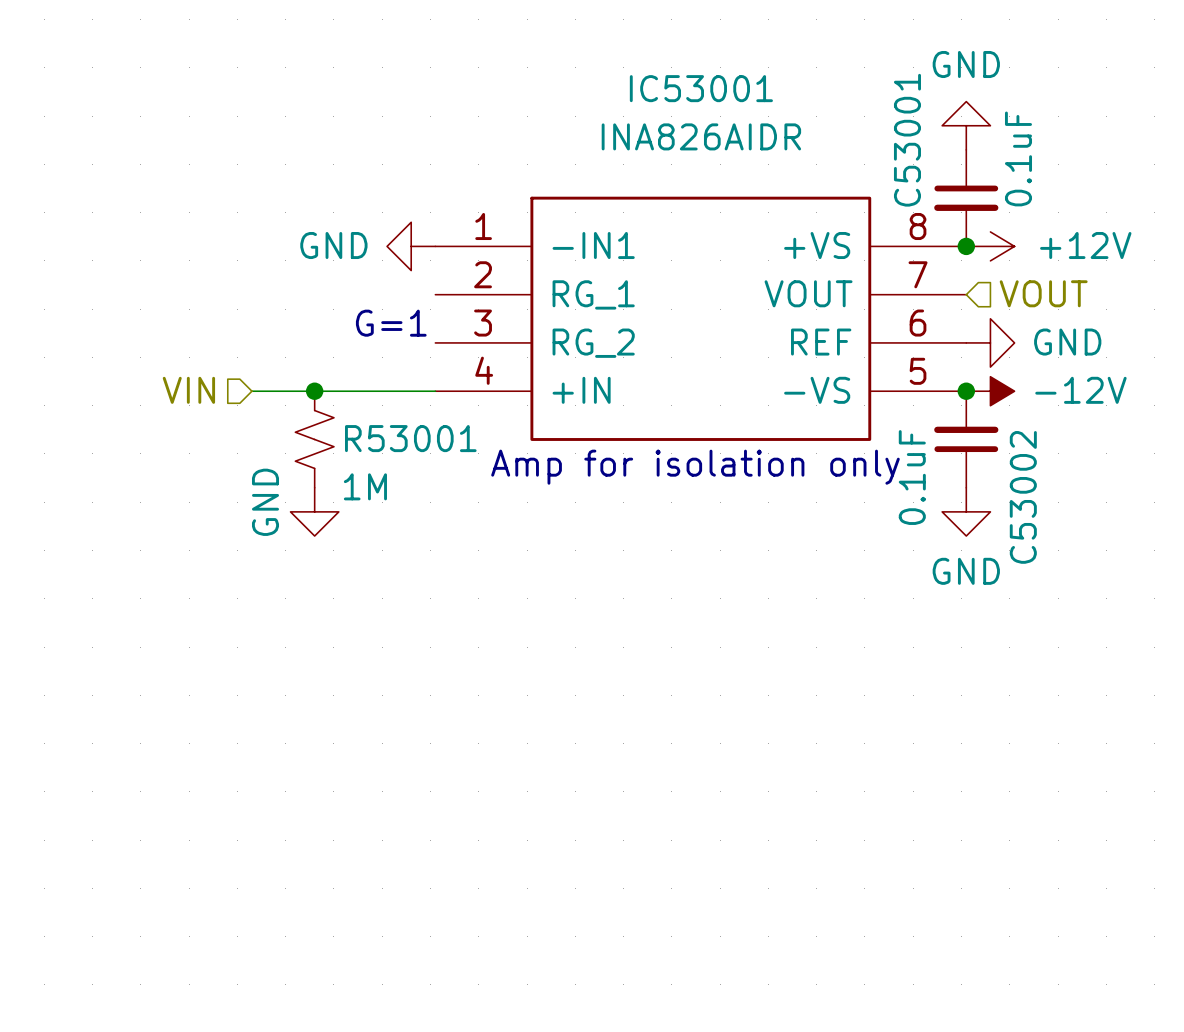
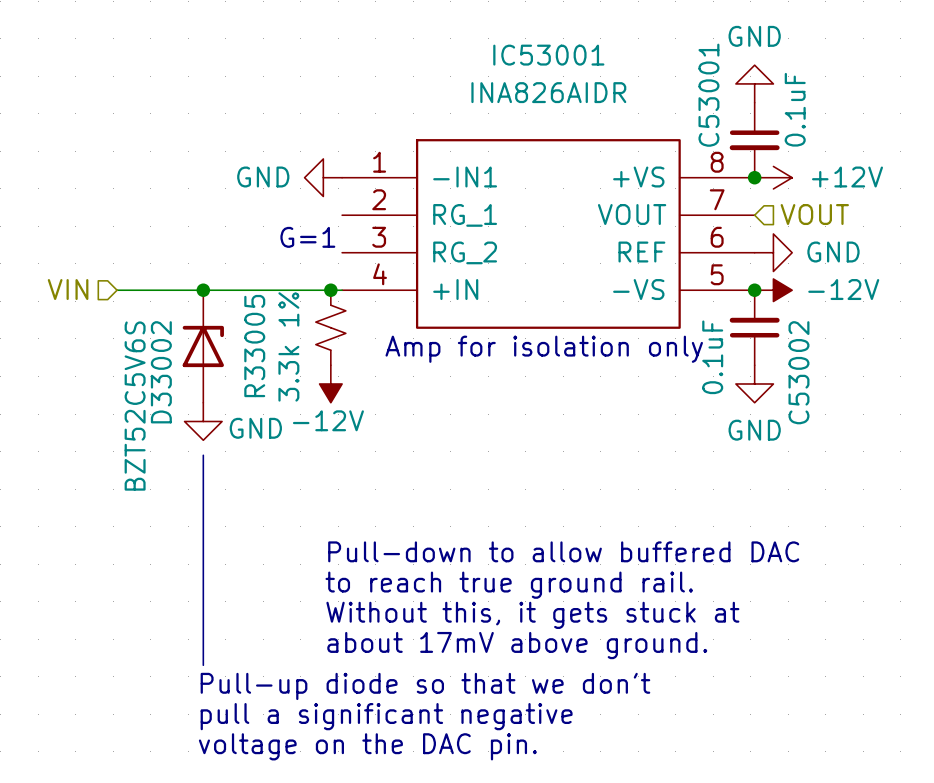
hierarchical label position: VIN (188, 390) -> VIN (68, 289)
wire: none -> (117, 290) (199, 290)
junction: none -> (203, 290)
junction: (314, 391) -> none
junction: none -> (330, 290)
R53001: 1M (314, 439) -> none
R33005: none -> 3.3k 1% (330, 327)
D33002: none -> BZT52C5V6S (203, 346)
power symbol text rotation: 0° (265, 502) -> 90° clockwise (255, 428)
power symbol position: GND (314, 511) -> GND (203, 421)
power symbol: none -> -12V (330, 383)
line: none -> (203, 455) (203, 665)
text: none -> Pull-down to allow buffered DAC (563, 551)
text: none -> to reach true ground rail. (509, 585)
text: none -> Without this, it gets stuck at (532, 615)
text: none -> about 17mV above ground. (517, 645)
text: none -> Pull-up diode so that we don't (425, 686)
text: none -> pull a significant negative (386, 716)
text: none -> voltage on the DAC pin. (367, 746)

